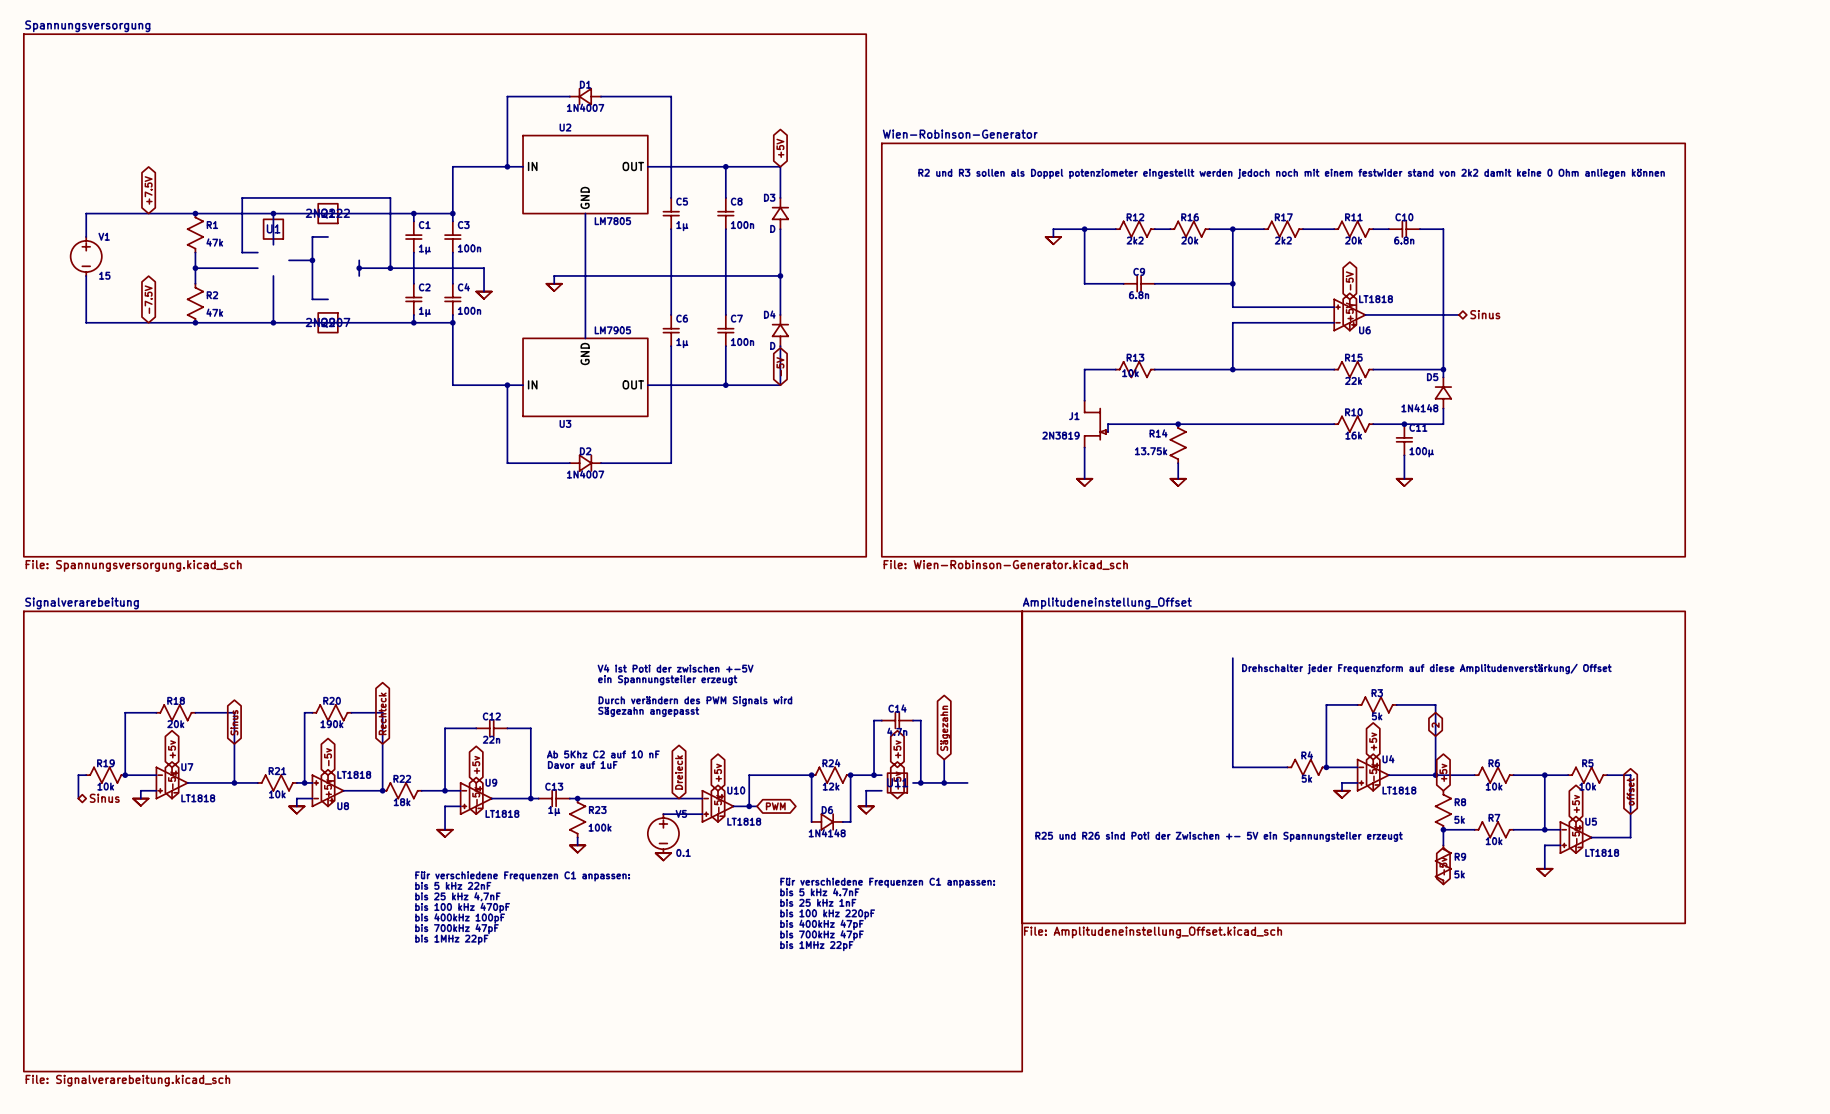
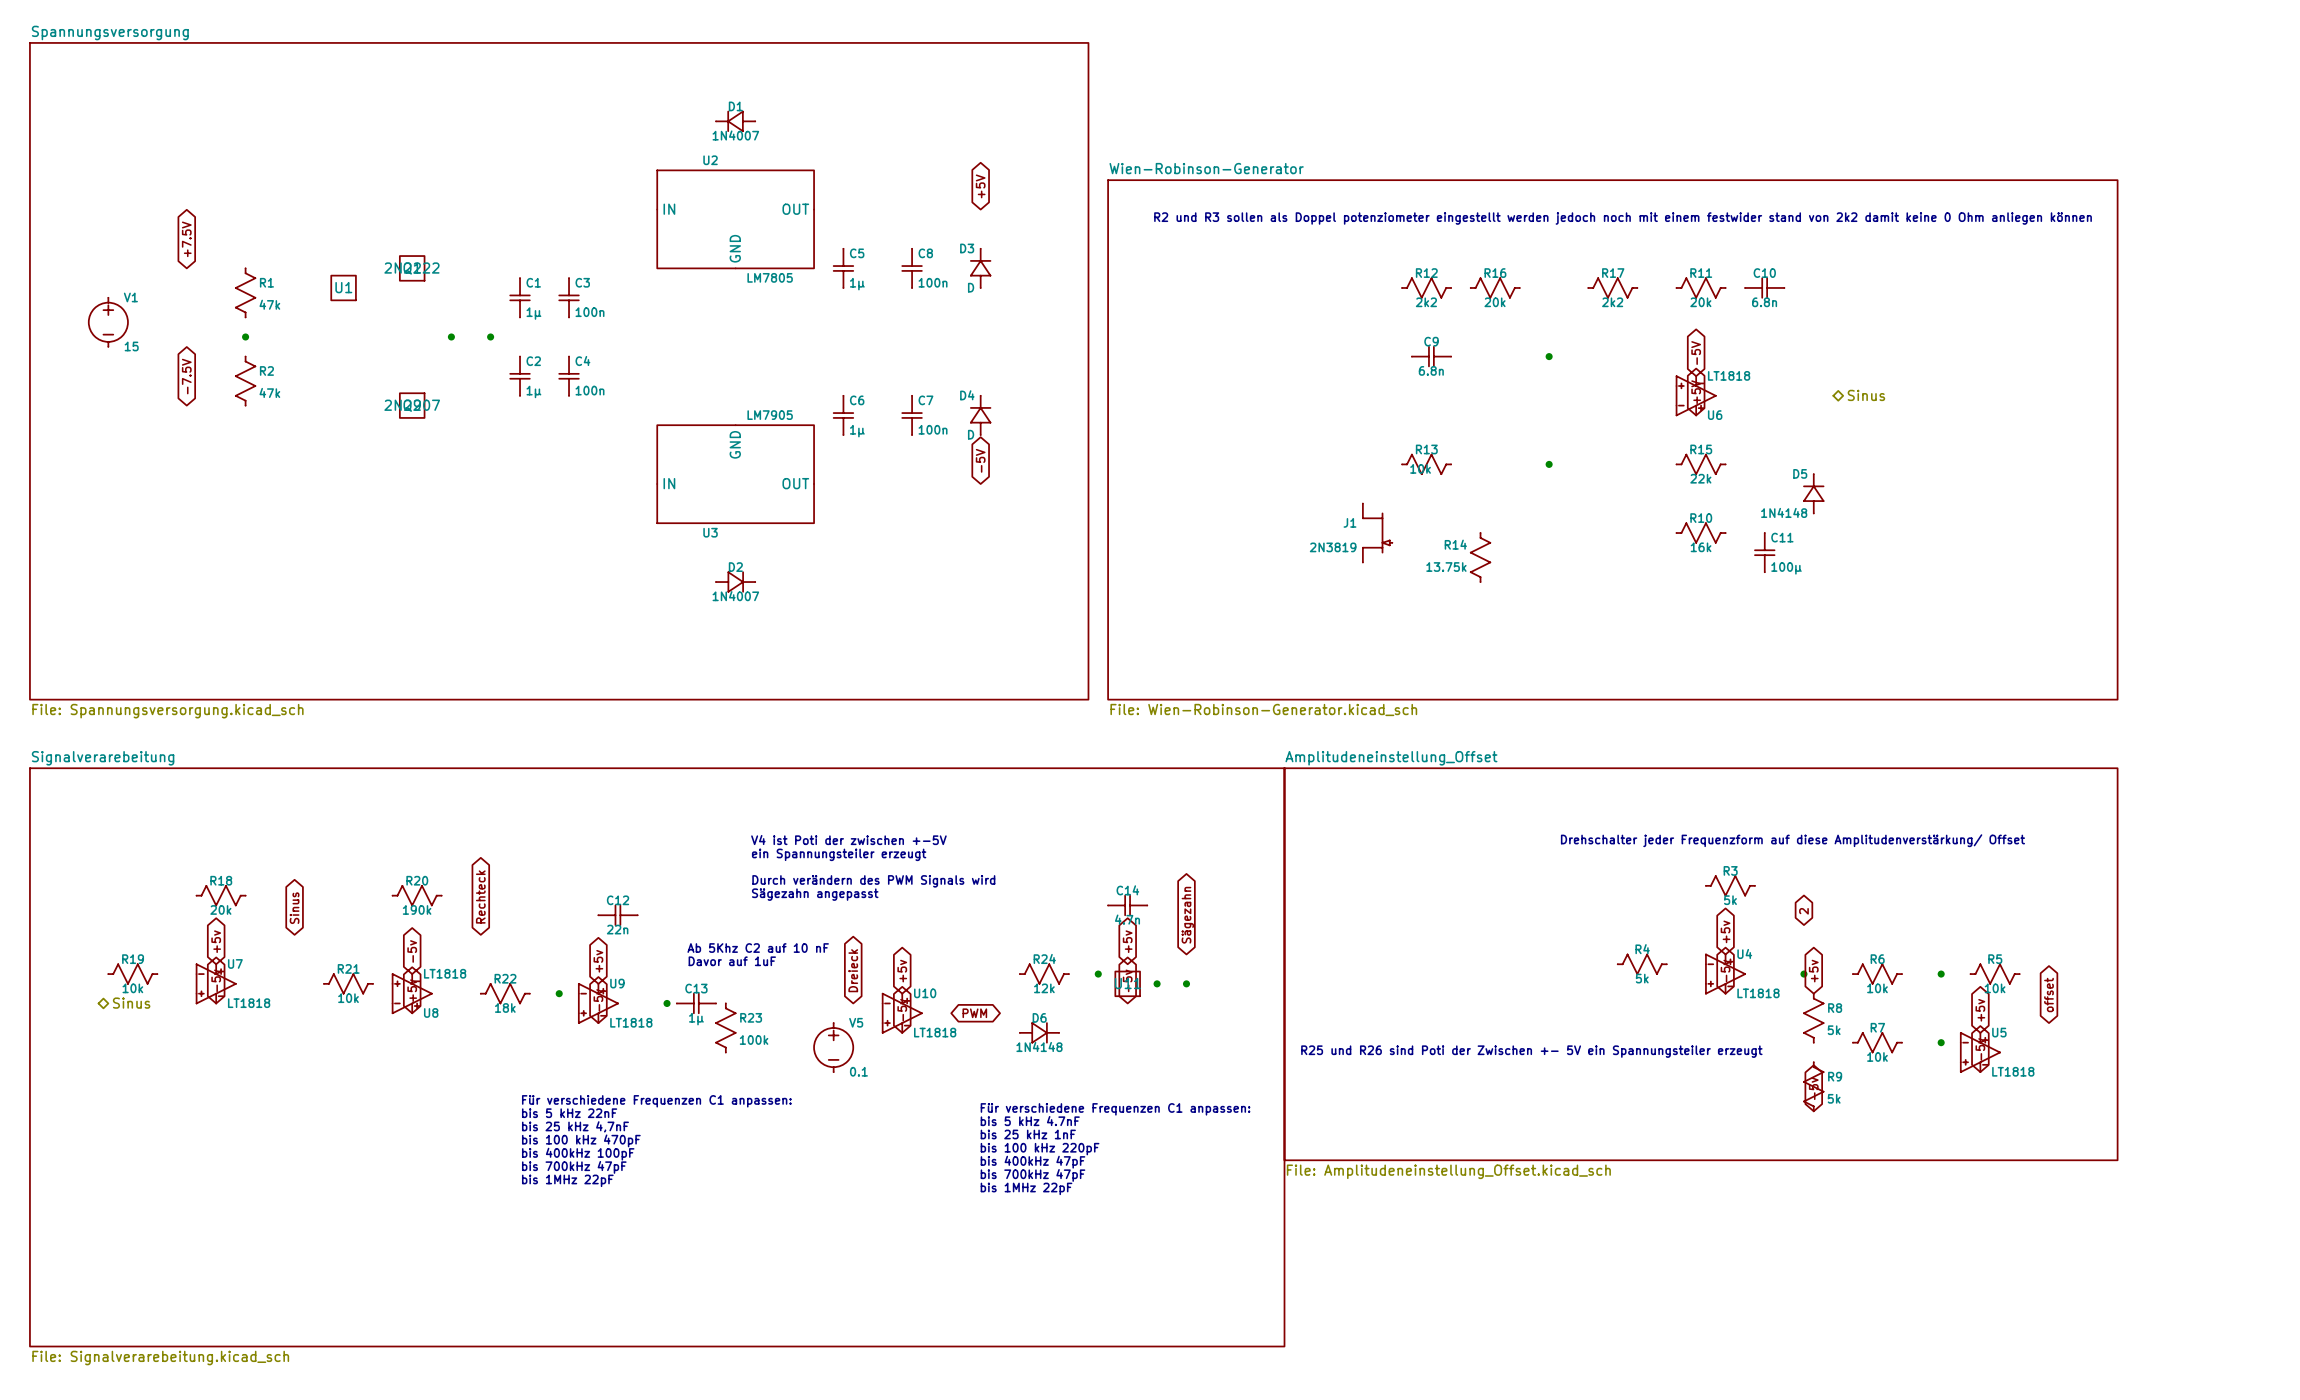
wire: (569, 96) (507, 96) (507, 166) -> none
wire: (601, 96) (671, 96) (671, 197) -> none
junction: (507, 166) -> none
wire: (523, 166) (452, 166) (452, 221) -> none
wire: (647, 166) (780, 166) (780, 197) -> none
wire: (725, 166) (725, 197) -> none
junction: (725, 166) -> none
junction: (195, 213) -> none
wire: (273, 213) (273, 244) -> none
junction: (273, 213) -> none
wire: (413, 213) (413, 221) -> none
junction: (413, 213) -> none
wire: (452, 213) (86, 213) (86, 236) -> none
junction: (452, 213) -> none
wire: (585, 213) (585, 338) -> none
wire: (671, 229) (671, 314) -> none
wire: (725, 229) (725, 314) -> none
wire: (780, 229) (780, 314) -> none
wire: (1084, 229) (1084, 283) (1123, 283) -> none
junction: (1084, 229) -> none
wire: (1115, 229) (1053, 229) (1053, 236) -> none
wire: (1154, 229) (1170, 229) -> none
wire: (1209, 229) (1264, 229) -> none
wire: (1232, 229) (1232, 307) (1334, 307) -> none
junction: (1232, 229) -> none
wire: (1303, 229) (1334, 229) -> none
wire: (1373, 229) (1388, 229) -> none
wire: (1420, 229) (1443, 229) (1443, 377) -> none
wire: (328, 236) (312, 236) (312, 299) (328, 299) -> none
power symbol: (1053, 240) -> none
wire: (195, 252) (195, 283) -> none
wire: (257, 252) (242, 252) (242, 197) (390, 197) (390, 268) -> none
wire: (413, 252) (413, 283) -> none
wire: (452, 252) (452, 283) -> none
wire: (289, 260) (312, 260) -> none
junction: (312, 260) -> none
wire: (359, 260) (359, 275) -> none
wire: (195, 268) (257, 268) -> none
wire: (359, 268) (484, 268) (484, 291) -> none
wire: (86, 275) (86, 322) (452, 322) -> none
wire: (273, 275) (273, 322) -> none
wire: (780, 275) (554, 275) (554, 283) -> none
junction: (780, 275) -> none
wire: (1154, 283) (1232, 283) -> none
power symbol: (554, 287) -> none
power symbol: (484, 295) -> none
wire: (413, 314) (413, 322) -> none
wire: (452, 314) (452, 385) (523, 385) -> none
wire: (1365, 314) (1459, 314) -> none
junction: (195, 322) -> none
junction: (273, 322) -> none
junction: (413, 322) -> none
junction: (452, 322) -> none
wire: (1334, 322) (1232, 322) (1232, 369) -> none
wire: (671, 346) (671, 463) (601, 463) -> none
wire: (725, 346) (725, 385) -> none
wire: (780, 346) (780, 385) (647, 385) -> none
wire: (1115, 369) (1084, 369) (1084, 400) -> none
wire: (1154, 369) (1334, 369) -> none
wire: (1373, 369) (1443, 369) -> none
junction: (1443, 369) -> none
wire: (507, 385) (507, 463) (569, 463) -> none
junction: (507, 385) -> none
junction: (725, 385) -> none
wire: (1443, 408) (1443, 424) (1373, 424) -> none
junction: (1178, 424) -> none
wire: (1334, 424) (1108, 424) (1108, 431) -> none
junction: (1404, 424) -> none
wire: (1084, 447) (1084, 478) -> none
wire: (1404, 455) (1404, 478) -> none
wire: (1178, 463) (1178, 478) -> none
power symbol: (1084, 482) -> none
power symbol: (1178, 482) -> none
power symbol: (1404, 482) -> none
wire: (1232, 658) (1232, 767) (1287, 767) -> none
wire: (1357, 704) (1326, 704) (1326, 767) (1357, 767) -> none
wire: (1396, 704) (1435, 704) (1435, 775) -> none
wire: (156, 712) (125, 712) (125, 775) (156, 775) -> none
wire: (195, 712) (234, 712) (234, 782) -> none
wire: (312, 712) (304, 712) (304, 782) -> none
wire: (351, 712) (382, 712) (382, 790) (343, 790) -> none
wire: (881, 720) (874, 720) (874, 775) -> none
wire: (913, 720) (920, 720) (920, 782) -> none
wire: (476, 728) (445, 728) (445, 790) -> none
wire: (507, 728) (530, 728) (530, 798) -> none
wire: (944, 759) (944, 782) -> none
junction: (1326, 767) -> none
wire: (86, 775) (78, 775) (78, 798) -> none
junction: (125, 775) -> none
junction: (811, 775) -> none
junction: (850, 775) -> none
wire: (881, 775) (850, 775) (850, 821) (842, 821) -> none
wire: (1388, 775) (1474, 775) -> none
wire: (1513, 775) (1568, 775) -> none
wire: (1544, 775) (1544, 829) -> none
wire: (1607, 775) (1630, 775) (1630, 837) (1591, 837) -> none
wire: (187, 782) (257, 782) -> none
junction: (234, 782) -> none
wire: (296, 782) (312, 782) -> none
junction: (304, 782) -> none
wire: (913, 782) (967, 782) -> none
wire: (1357, 782) (1342, 782) (1342, 790) -> none
wire: (156, 790) (140, 790) (140, 798) -> none
junction: (382, 790) -> none
wire: (421, 790) (460, 790) -> none
wire: (881, 790) (866, 790) (866, 806) -> none
power symbol: (1342, 794) -> none
wire: (312, 798) (296, 798) (296, 806) -> none
wire: (491, 798) (538, 798) -> none
wire: (569, 798) (702, 798) -> none
junction: (577, 798) -> none
power symbol: (140, 802) -> none
wire: (460, 806) (445, 806) (445, 829) -> none
wire: (733, 806) (757, 806) -> none
wire: (749, 806) (749, 775) (811, 775) (811, 821) -> none
junction: (749, 806) -> none
power symbol: (296, 810) -> none
power symbol: (866, 810) -> none
wire: (663, 814) (702, 814) -> none
junction: (1443, 829) -> none
wire: (1474, 829) (1443, 829) (1443, 845) -> none
wire: (1513, 829) (1560, 829) -> none
power symbol: (445, 833) -> none
wire: (577, 837) (577, 845) -> none
wire: (1560, 845) (1544, 845) (1544, 868) -> none
power symbol: (577, 849) -> none
power symbol: (663, 856) -> none
power symbol: (1544, 872) -> none

